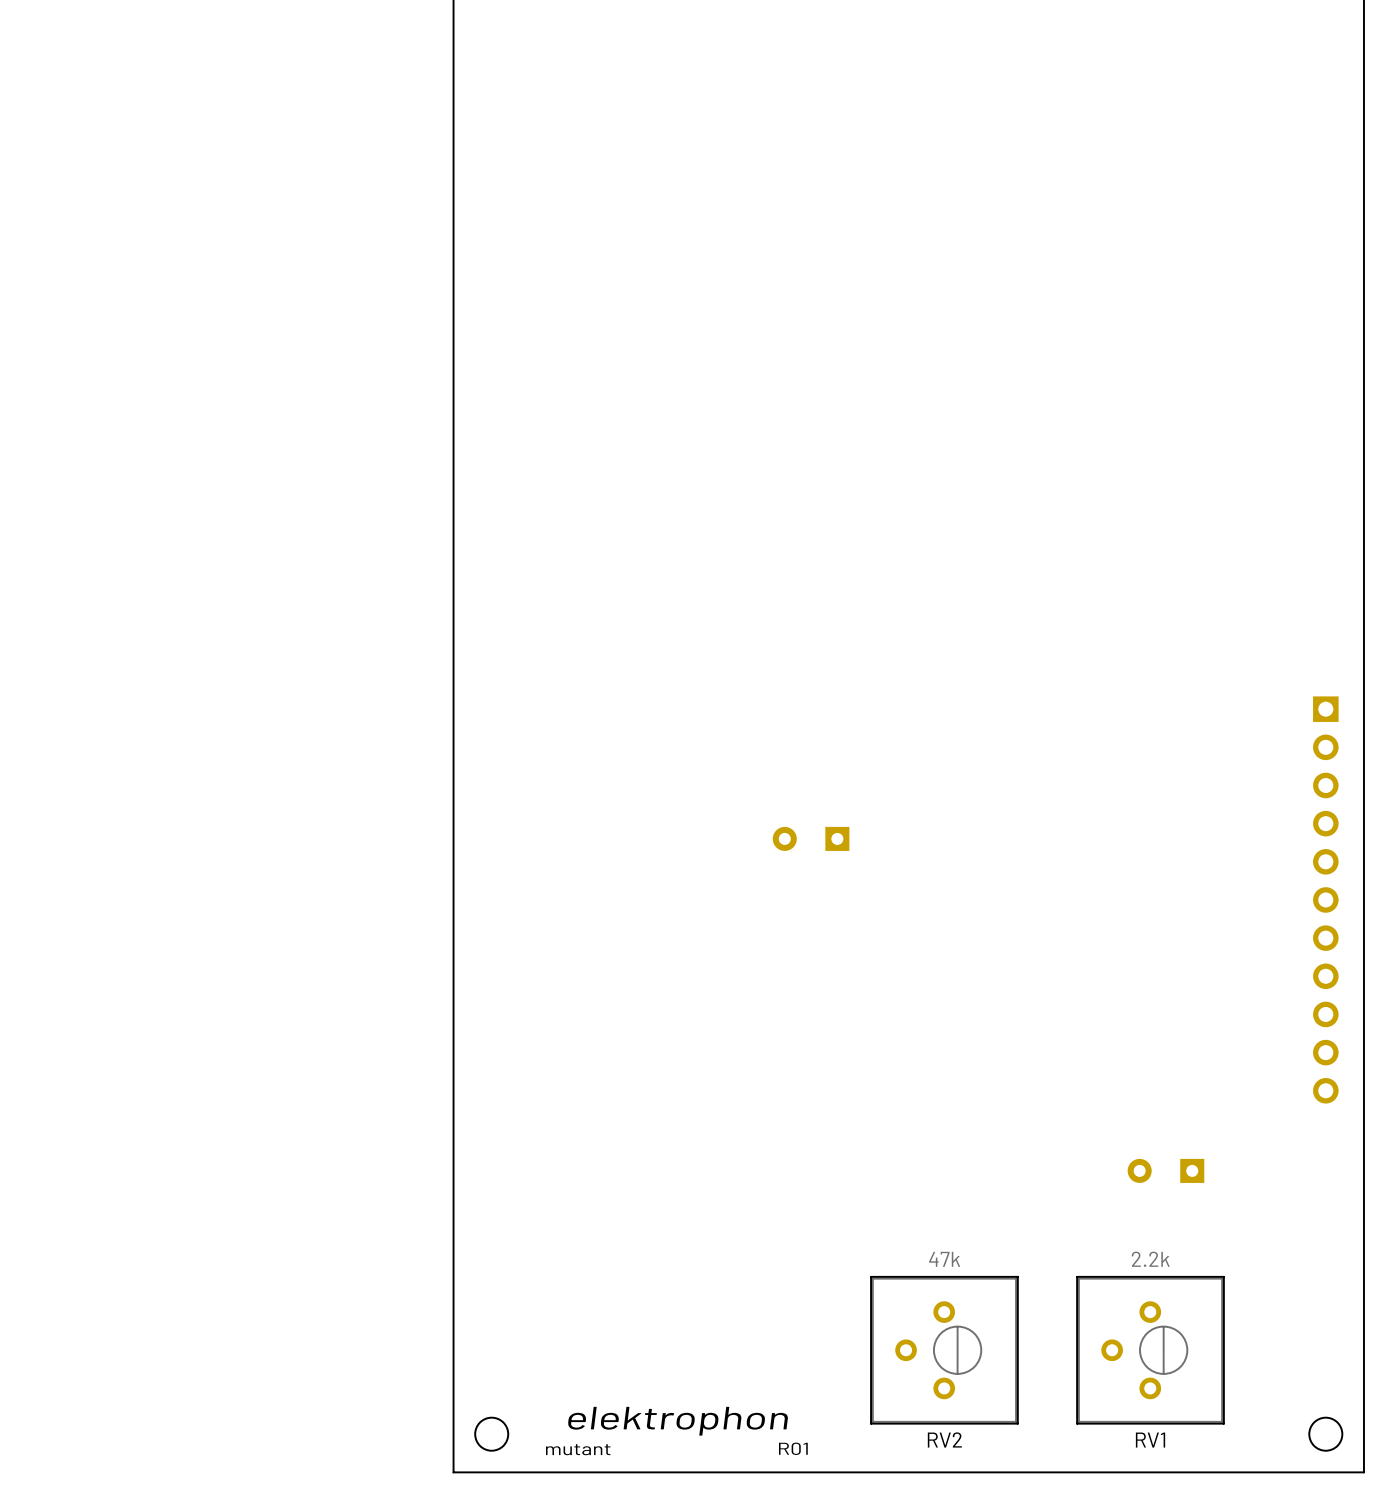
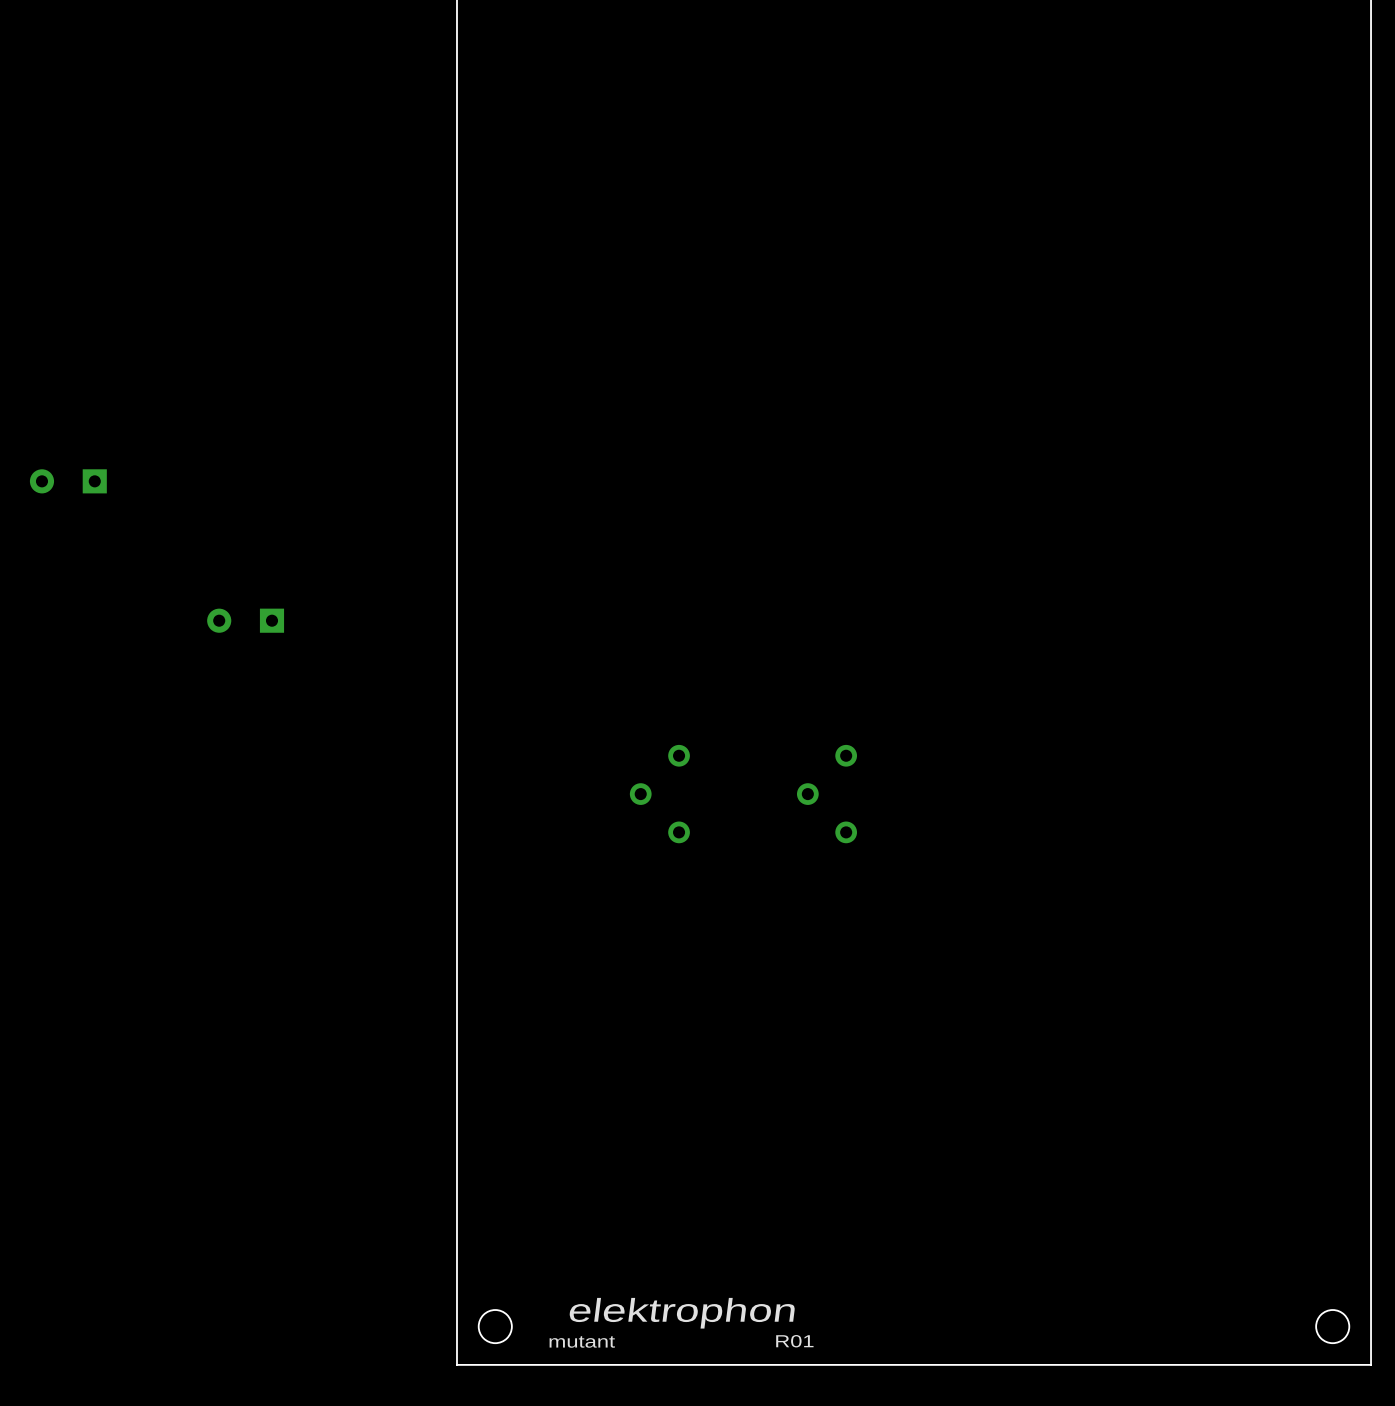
part: none -> (68, 481)
part: none -> (245, 620)
part: (811, 838) -> none
part: (1325, 899) -> none
part: none -> (659, 794)
part: none -> (827, 794)
part: (1165, 1170) -> none
RV2: 47k (944, 1350) -> none
RV1: 2.2k (1150, 1350) -> none

